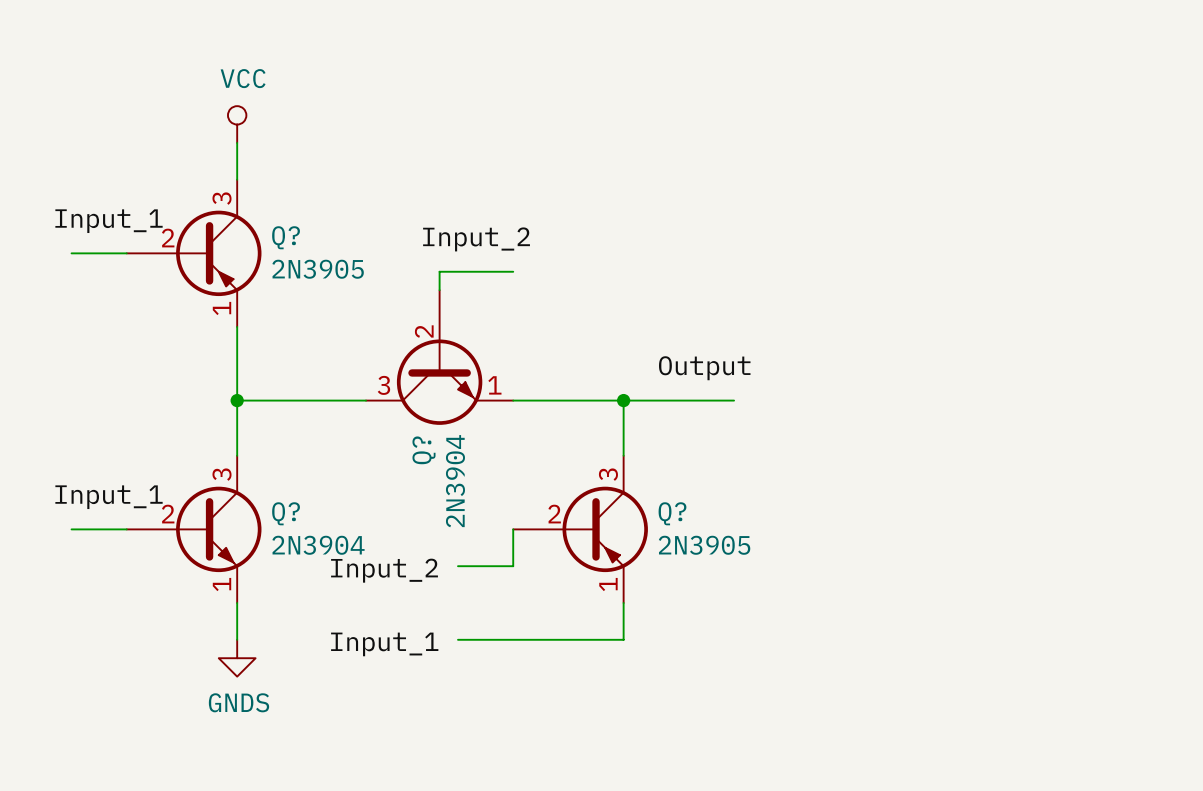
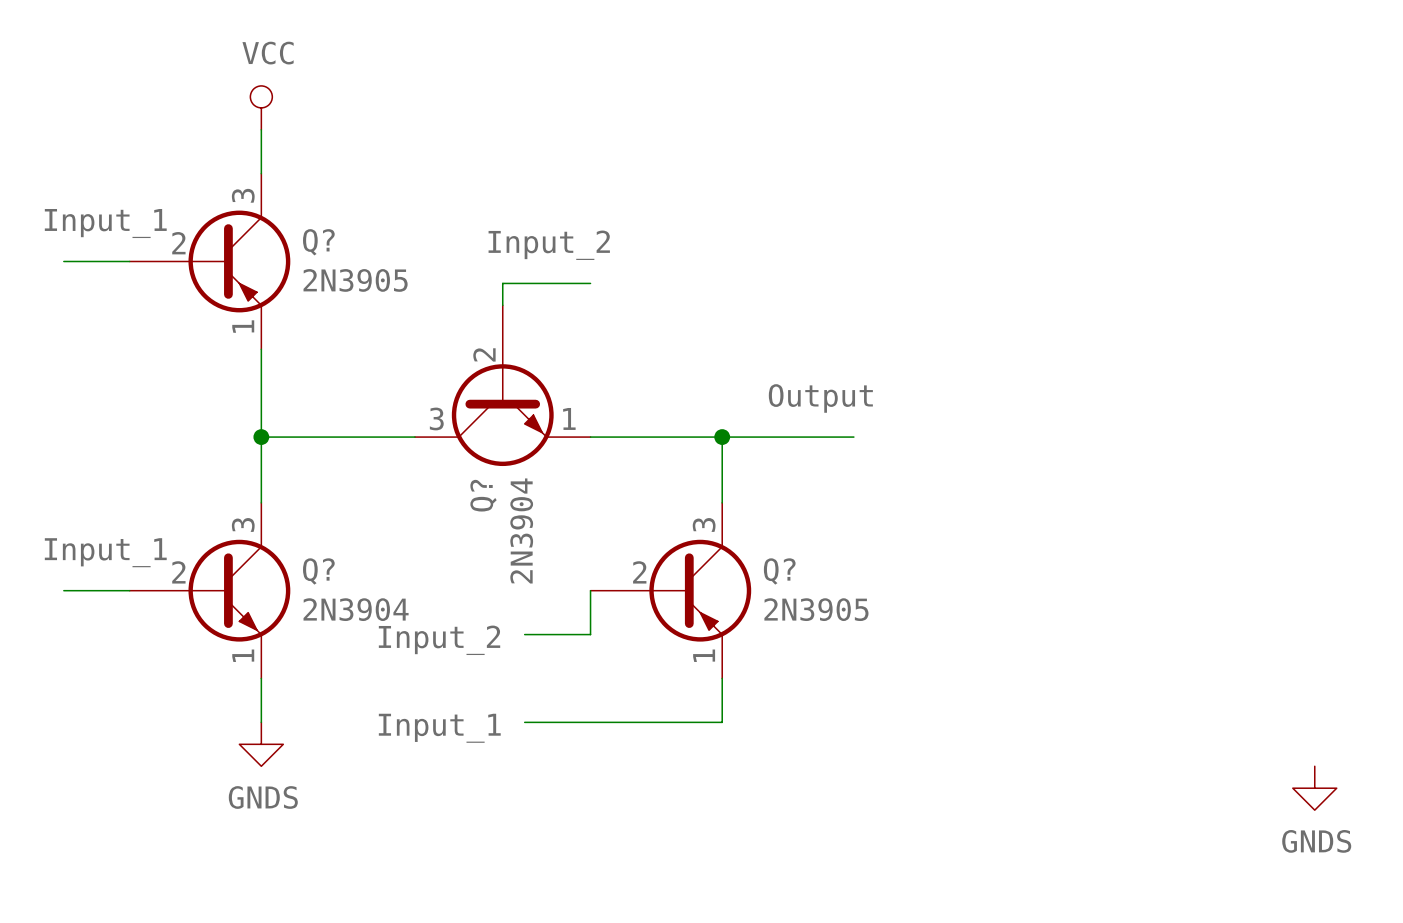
power symbol: none -> GNDS (1314, 788)

